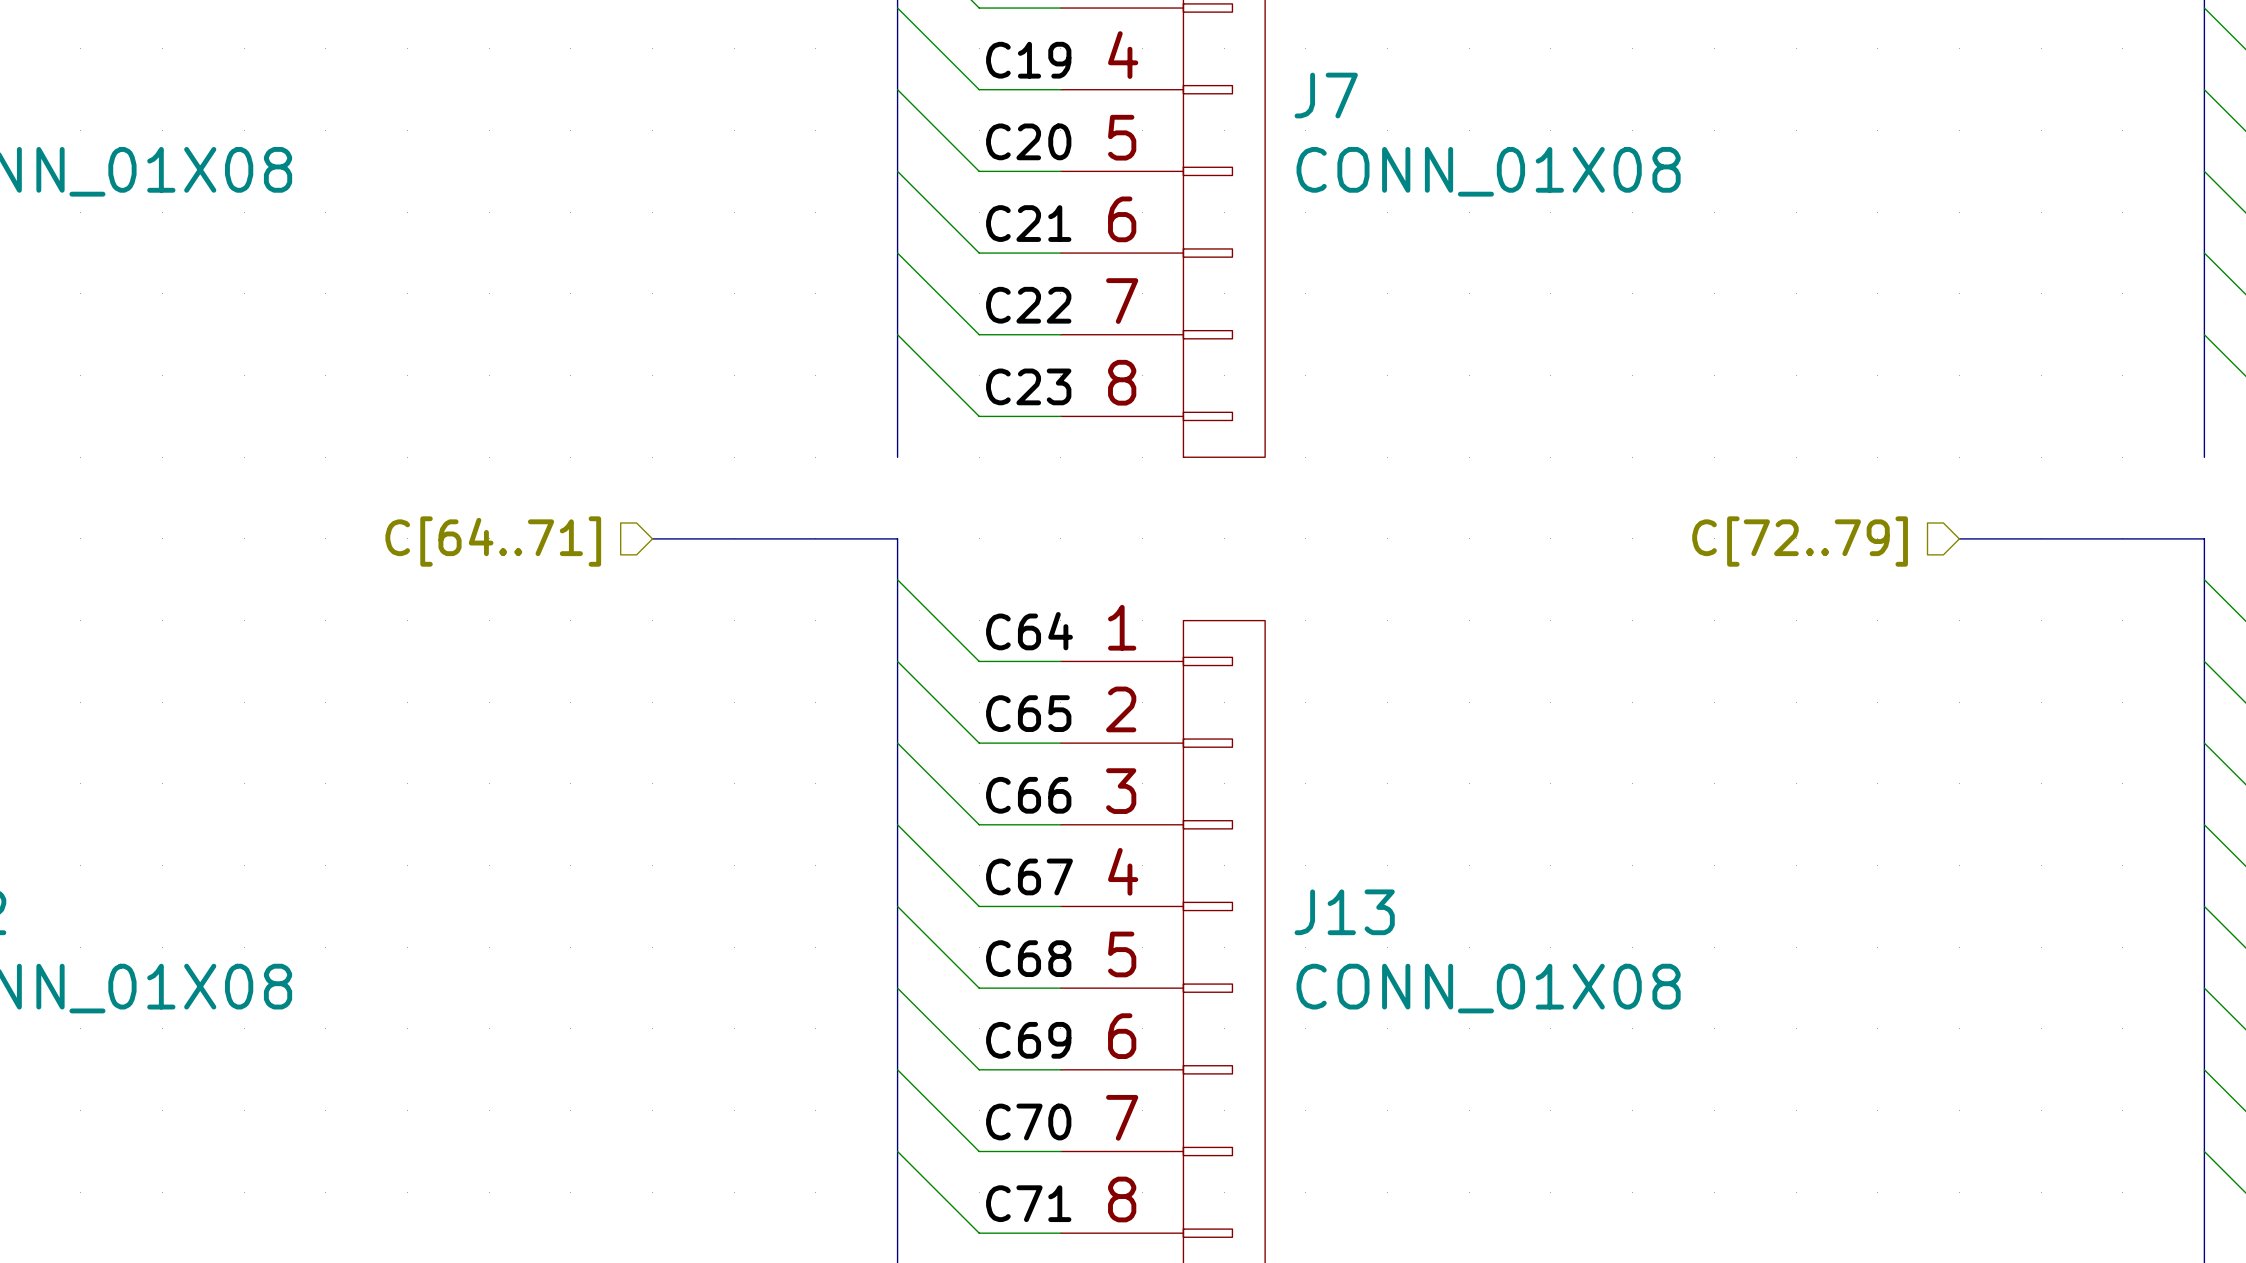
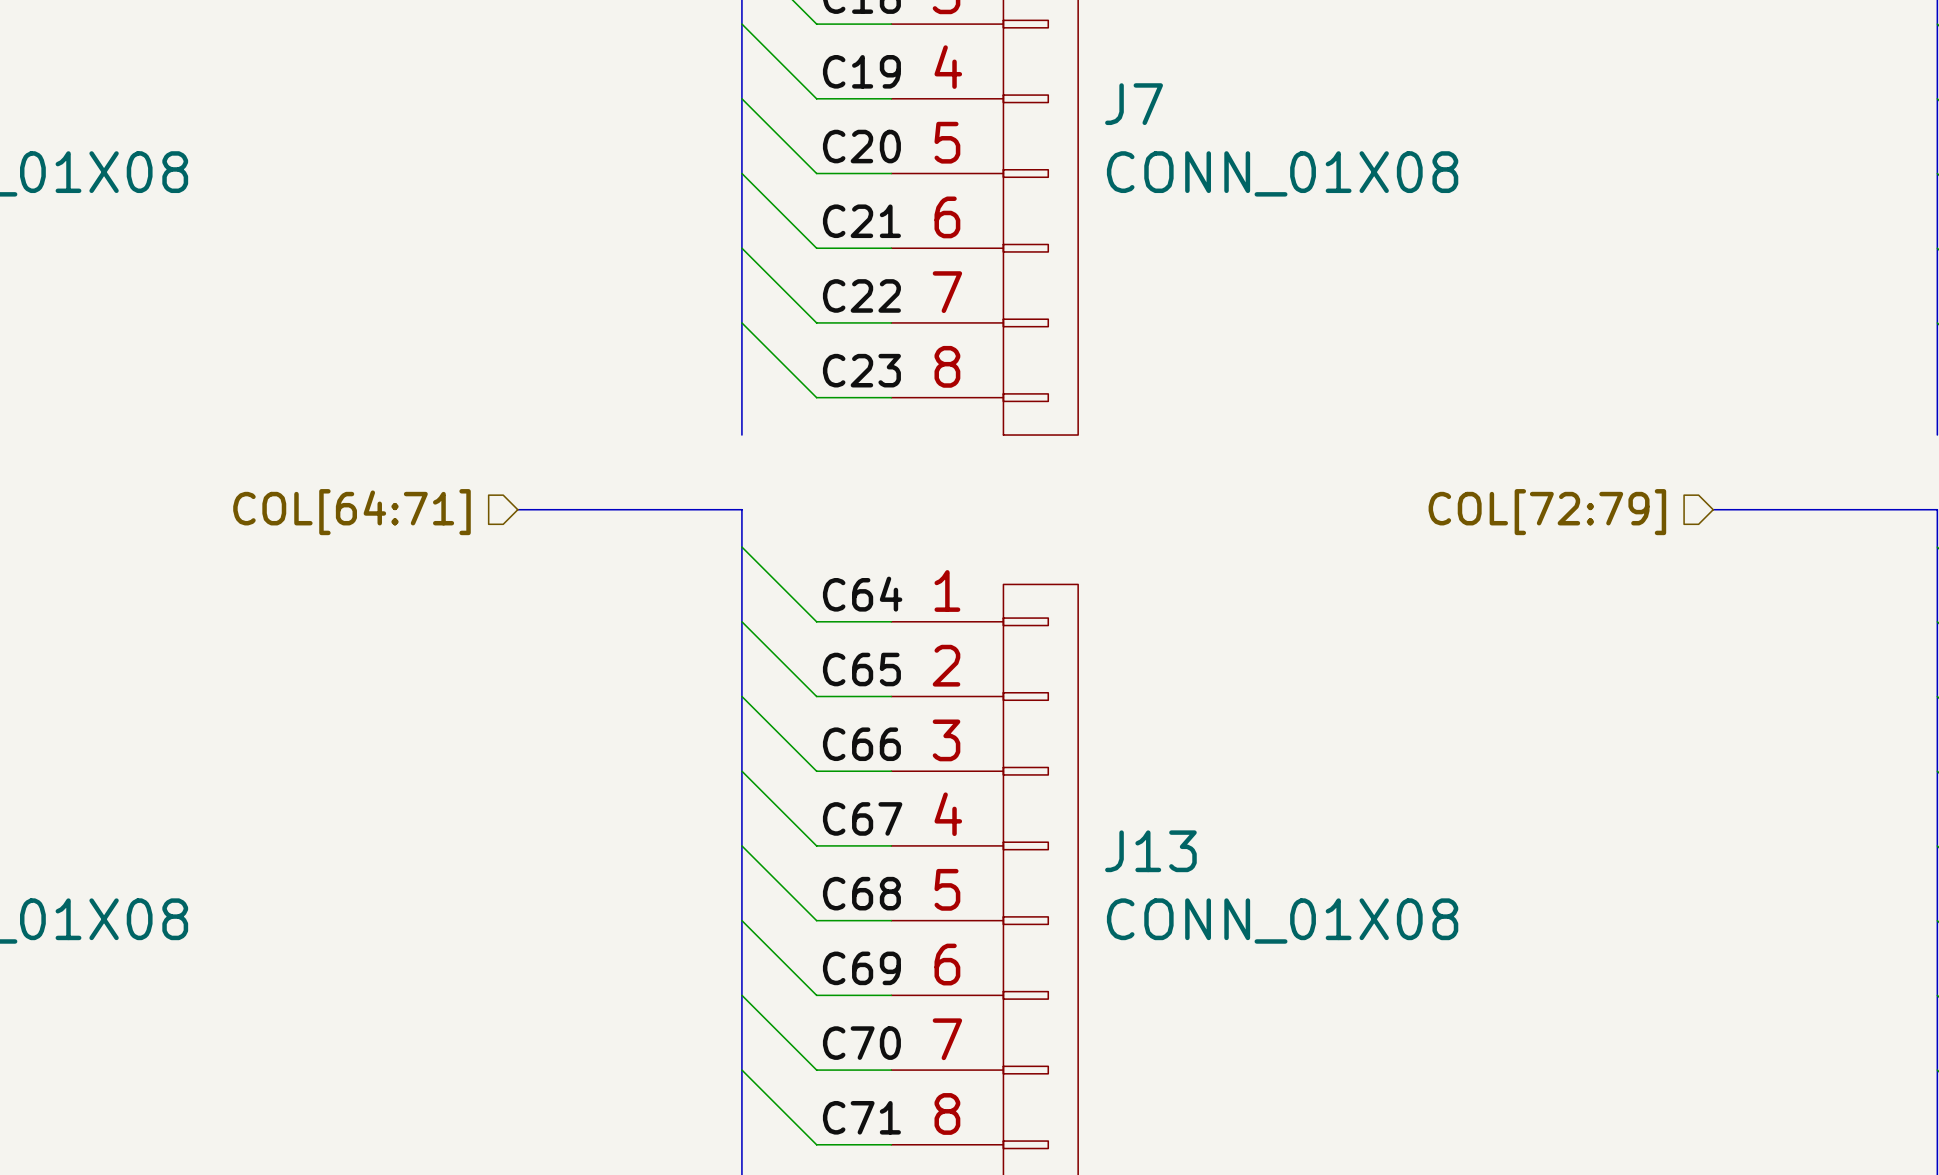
hierarchical label: C[64..71] (493, 541) -> COL[64:71] (351, 512)
hierarchical label: C[72..79] (1800, 541) -> COL[72:79] (1547, 512)

